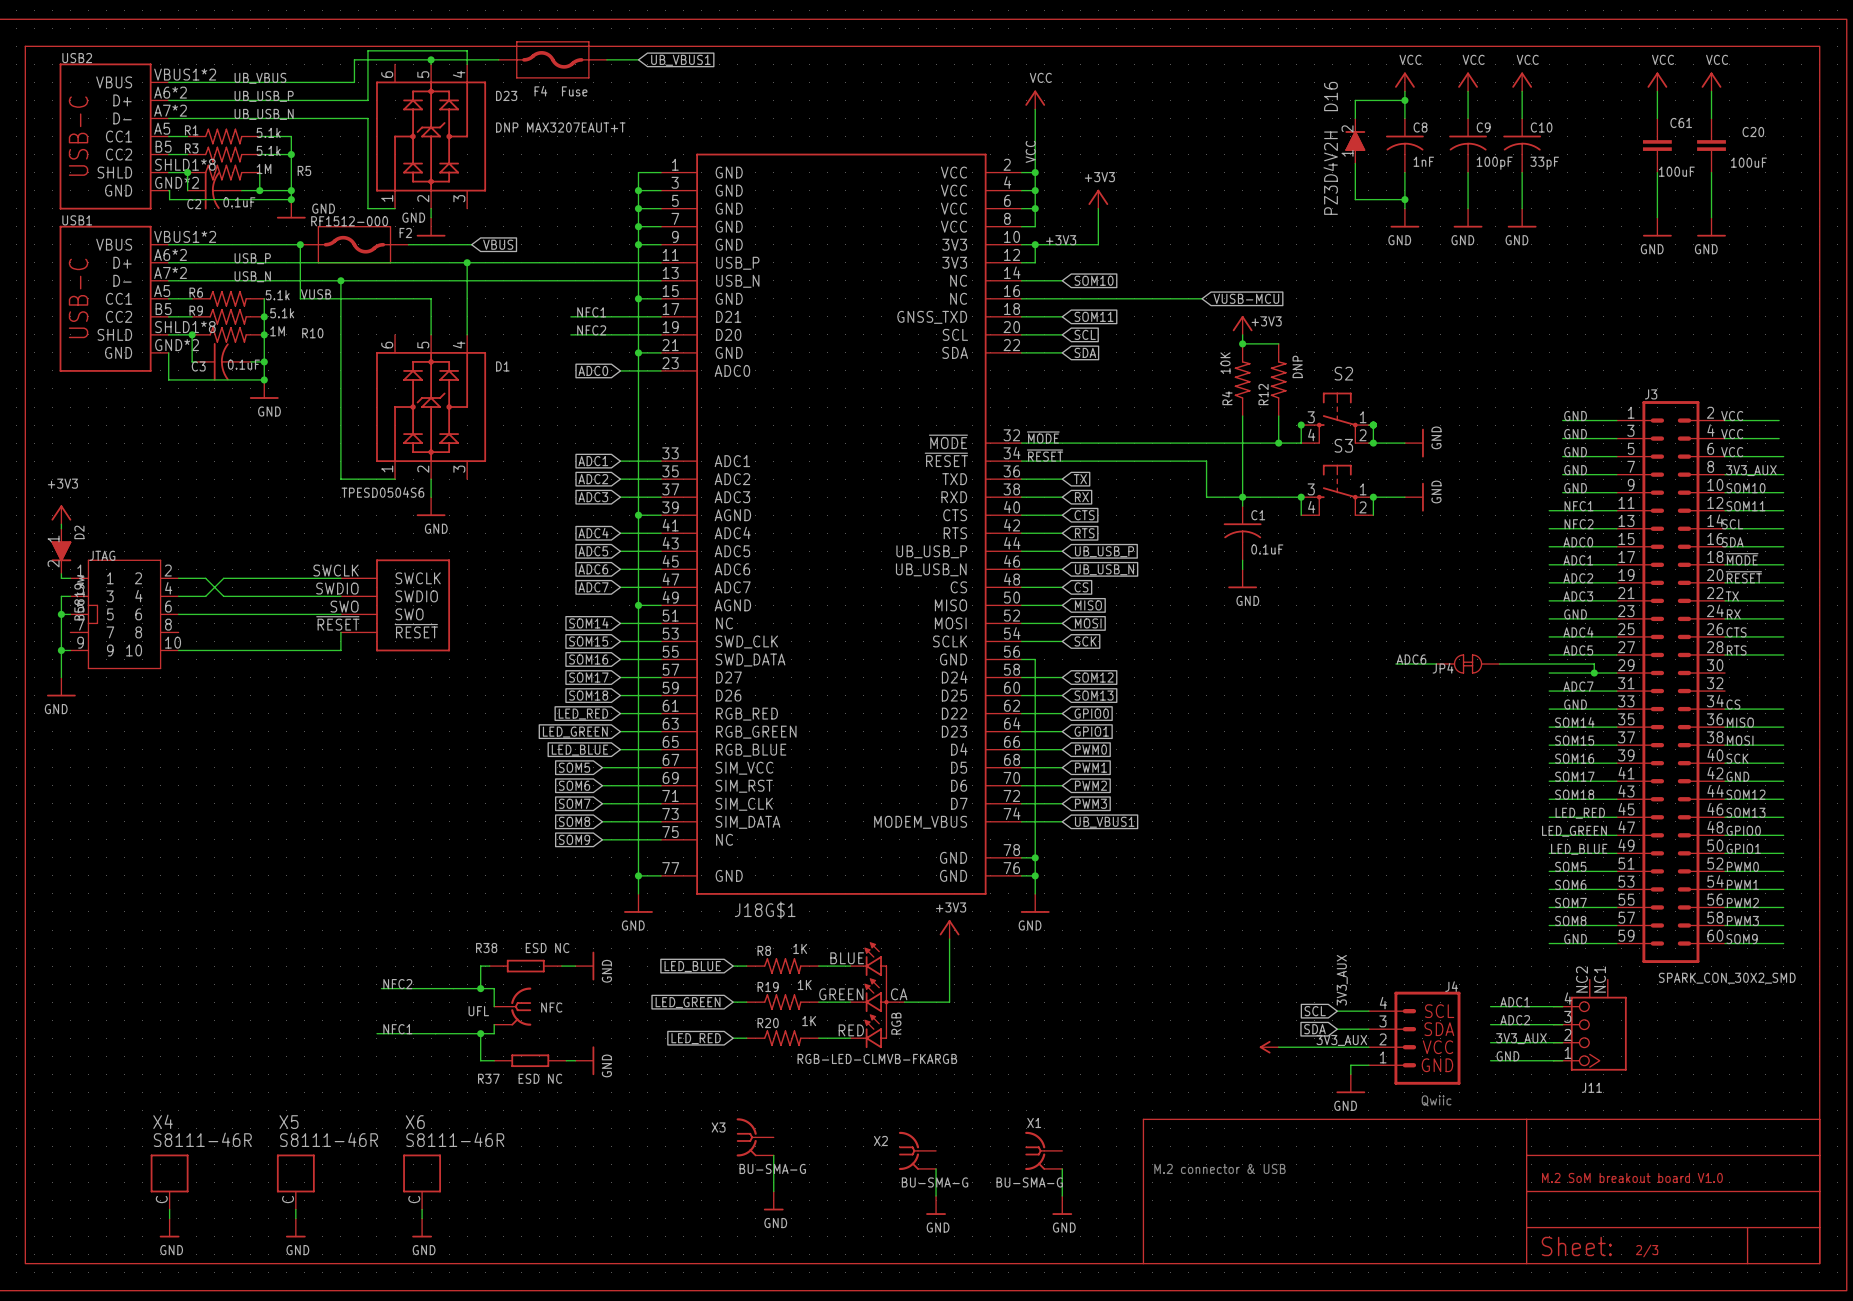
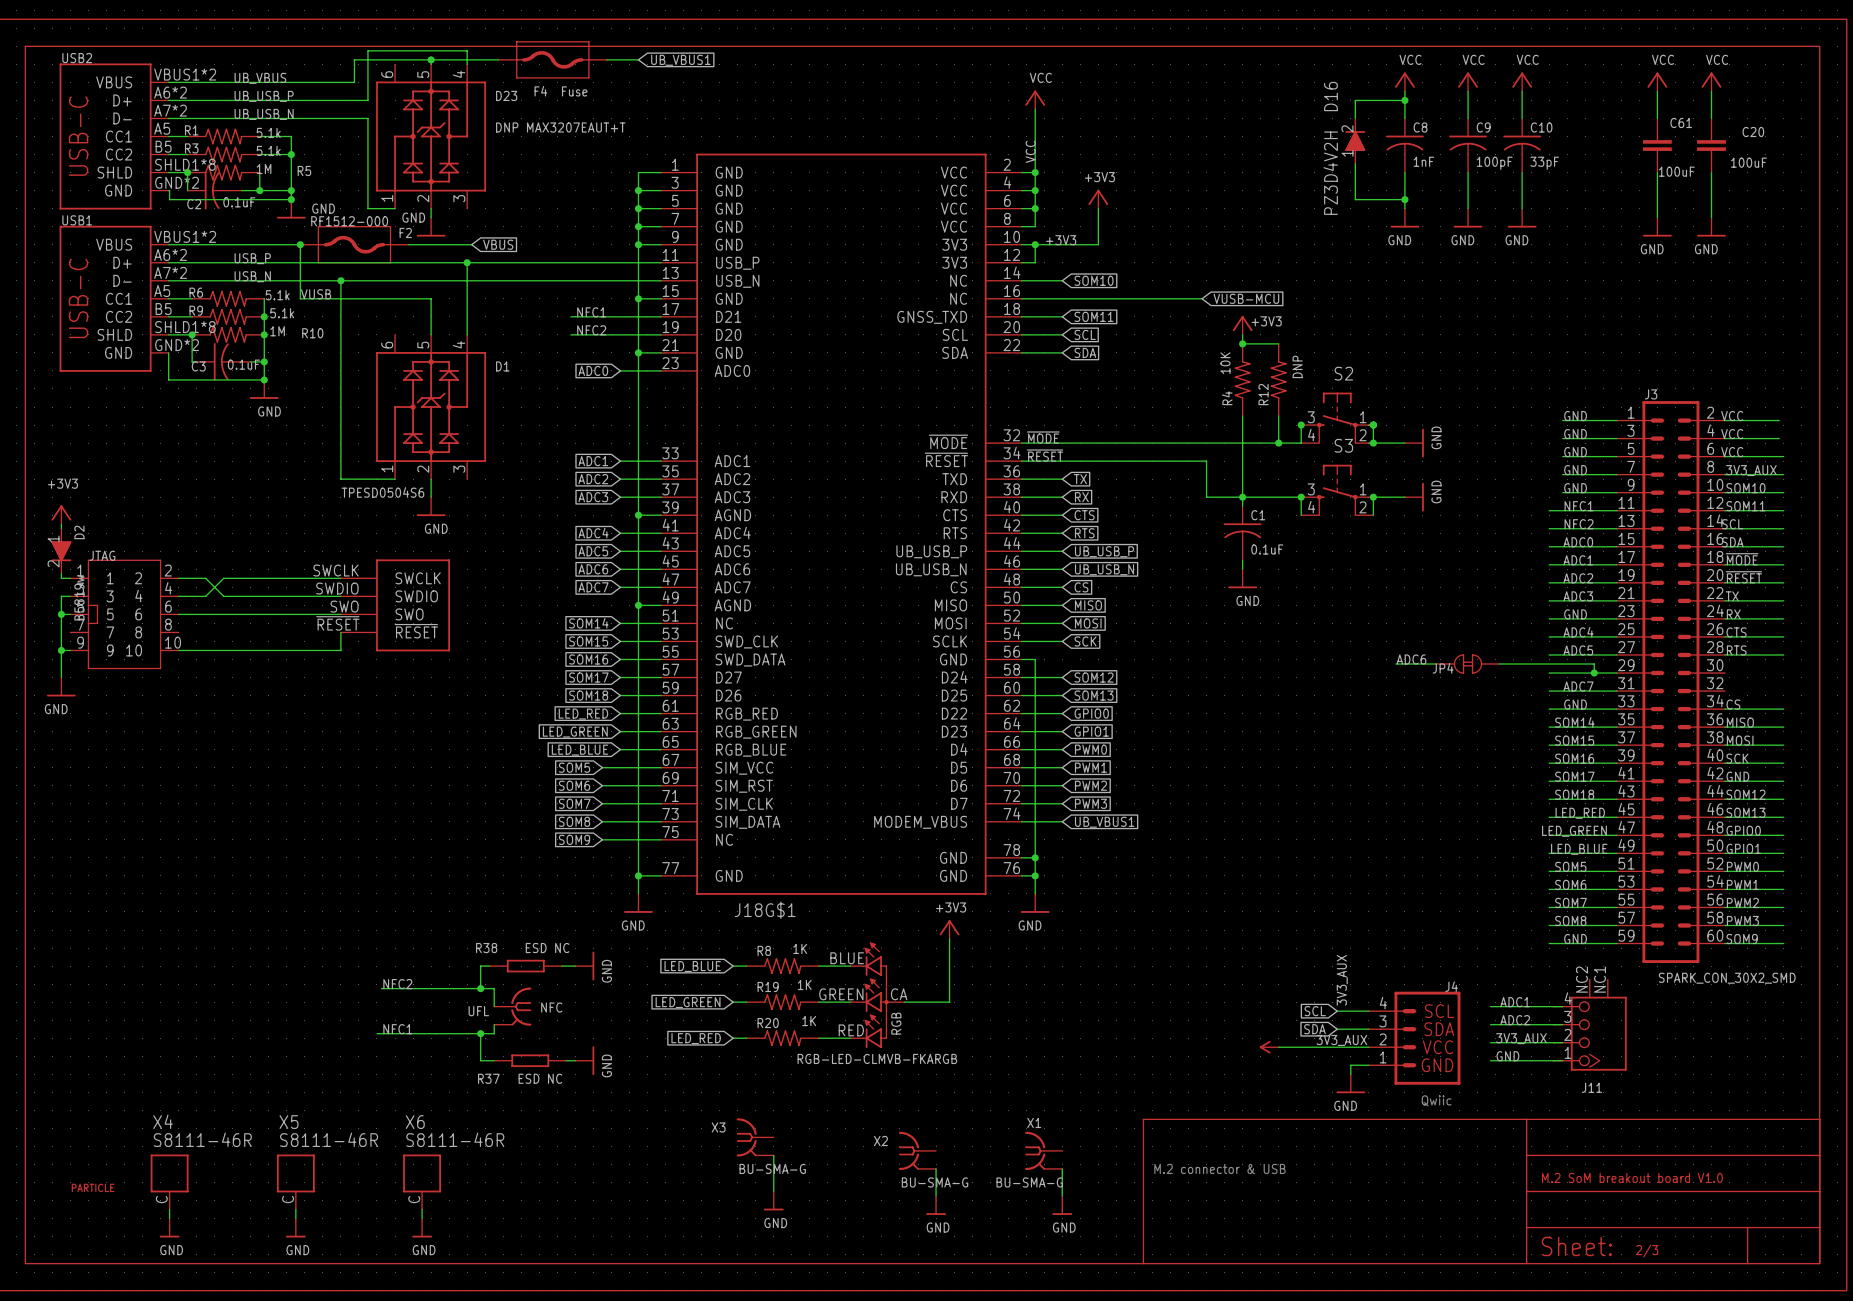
part: none -> (93, 1187)

